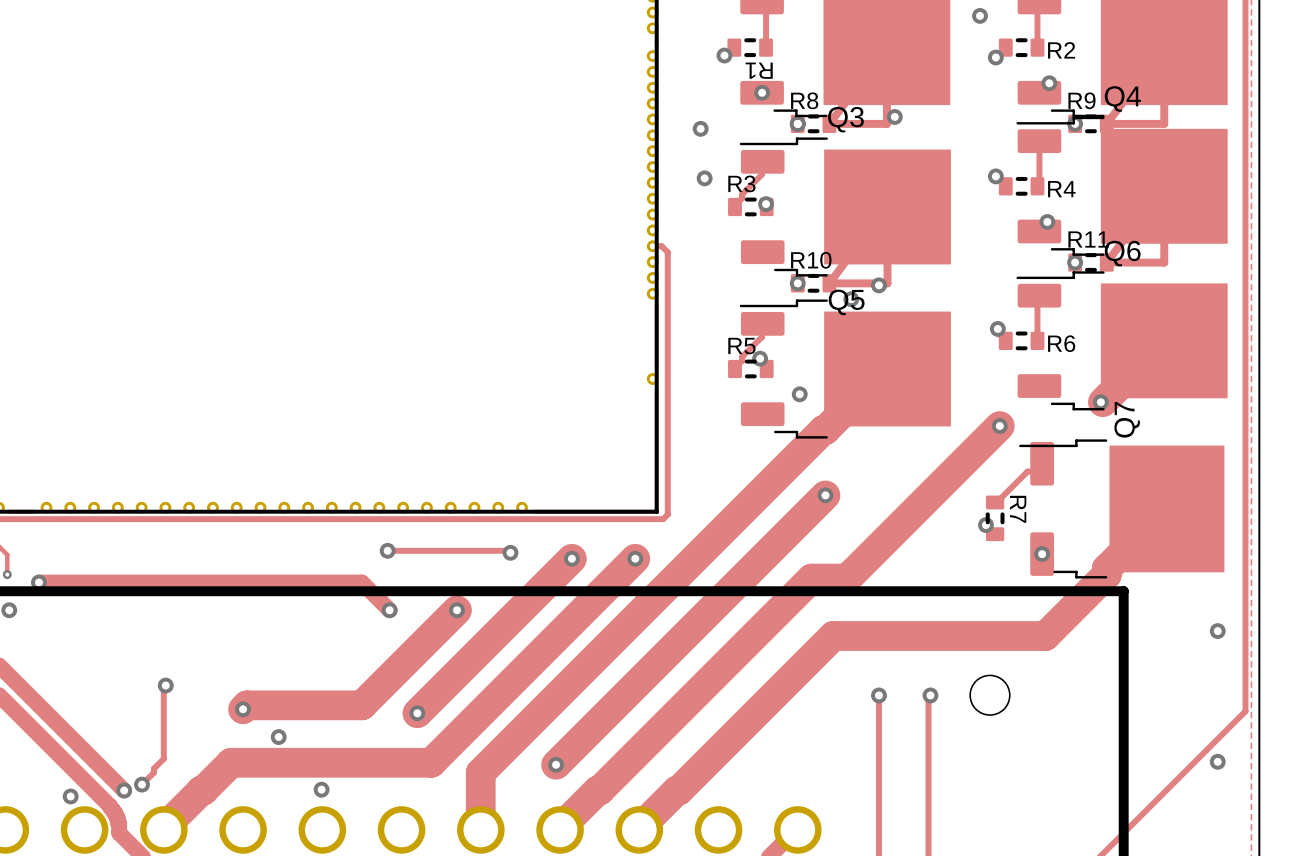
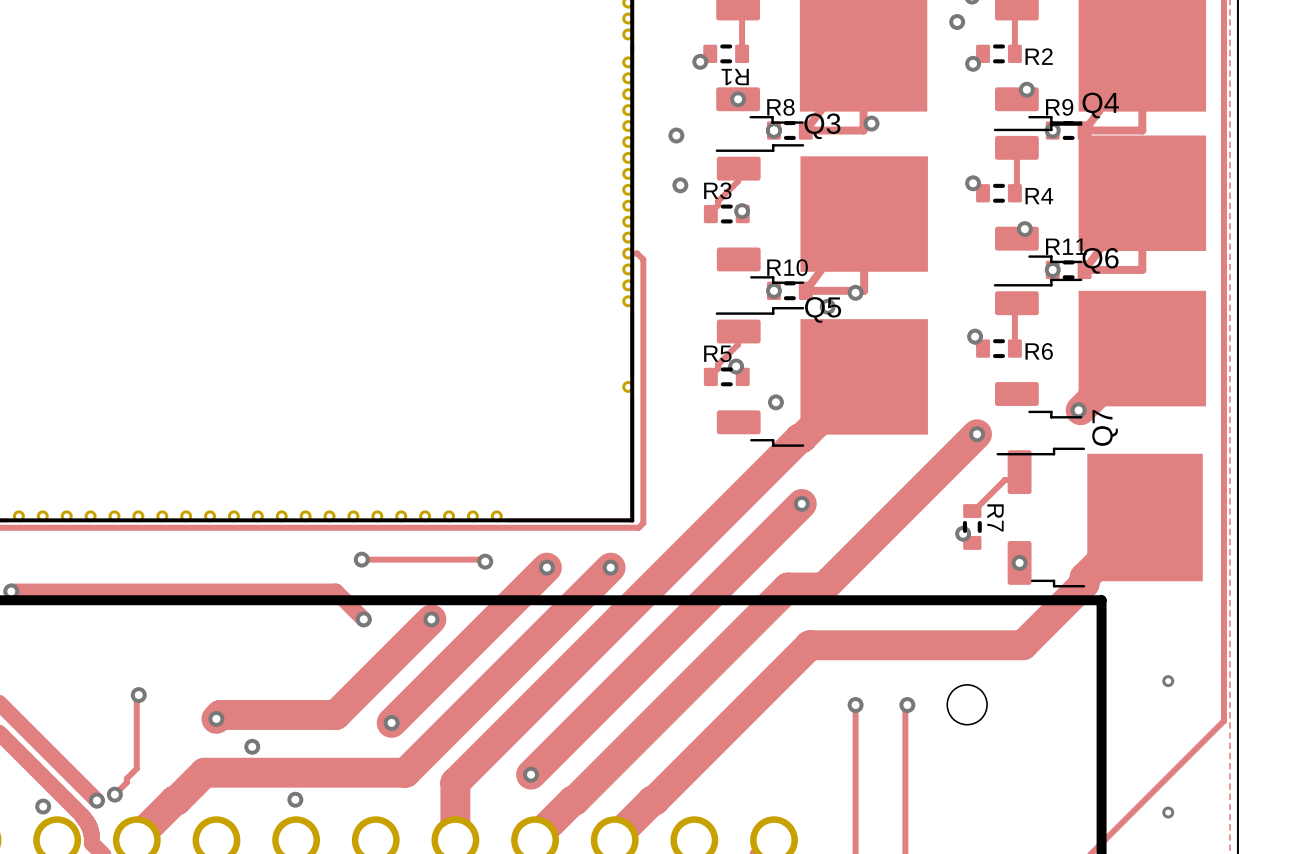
via: (1217, 631) -> none
via: none -> (1168, 681)
via: (1217, 761) -> none
via: none -> (1168, 812)

